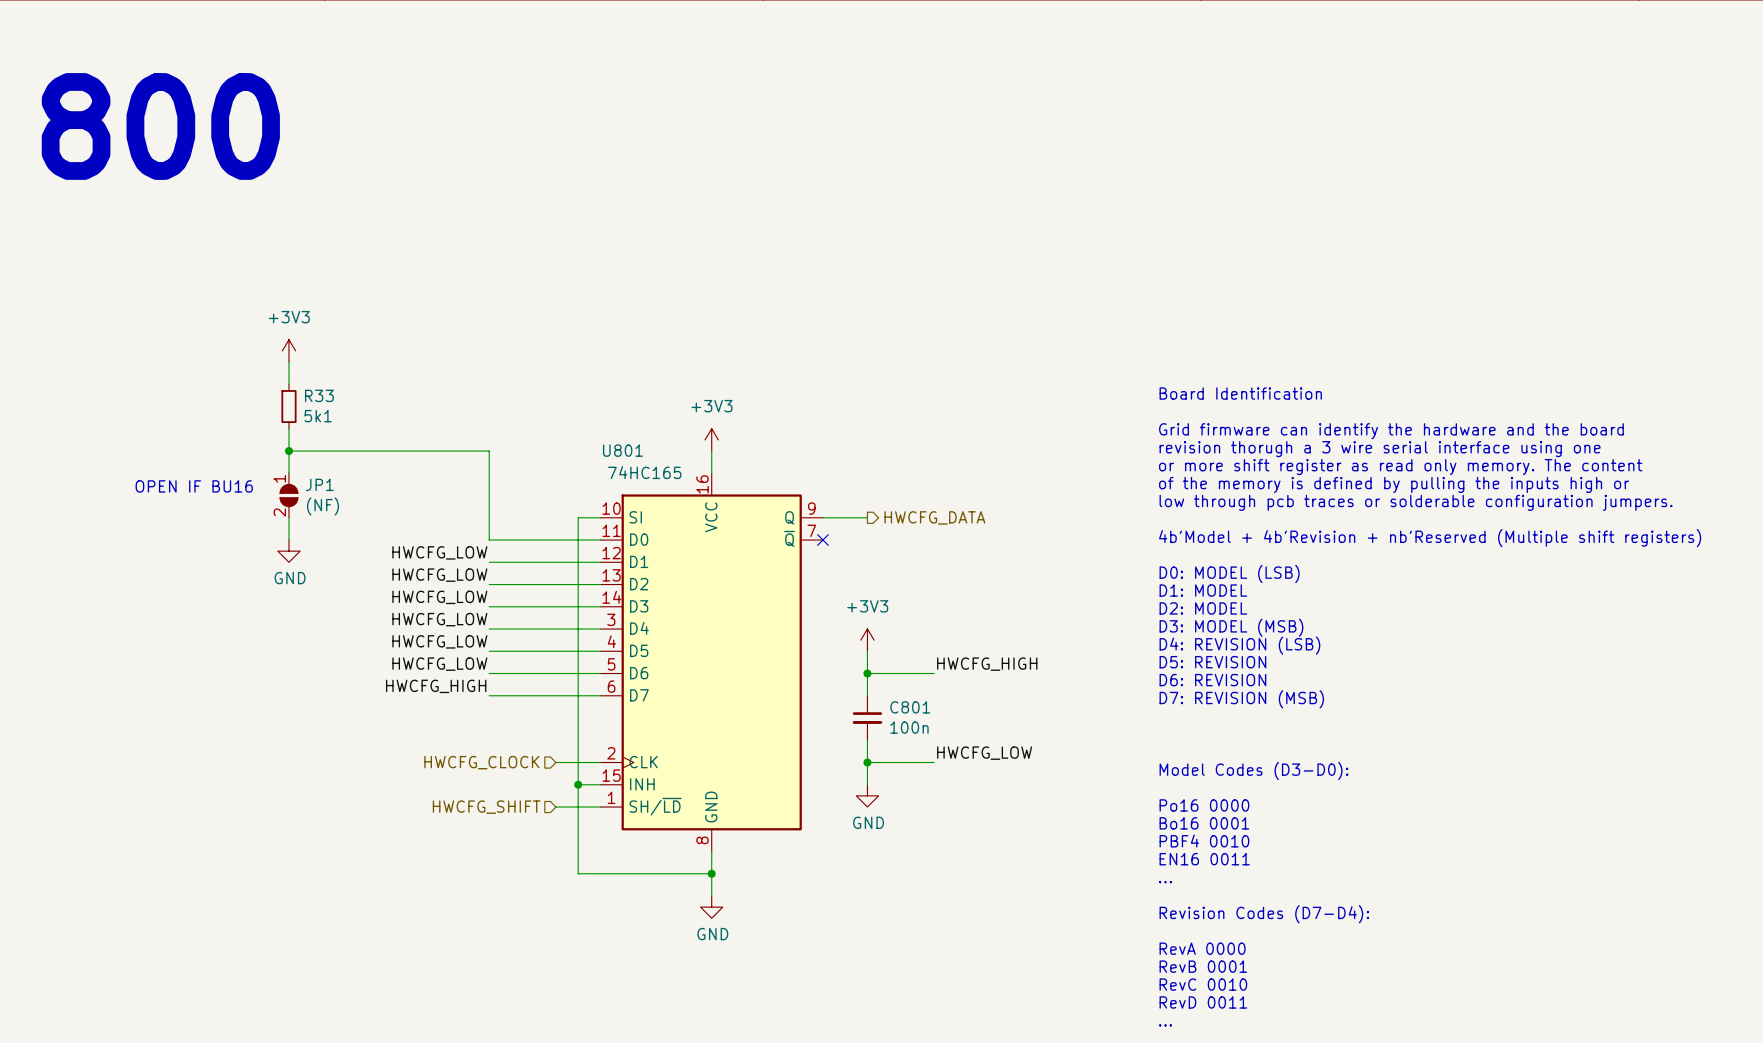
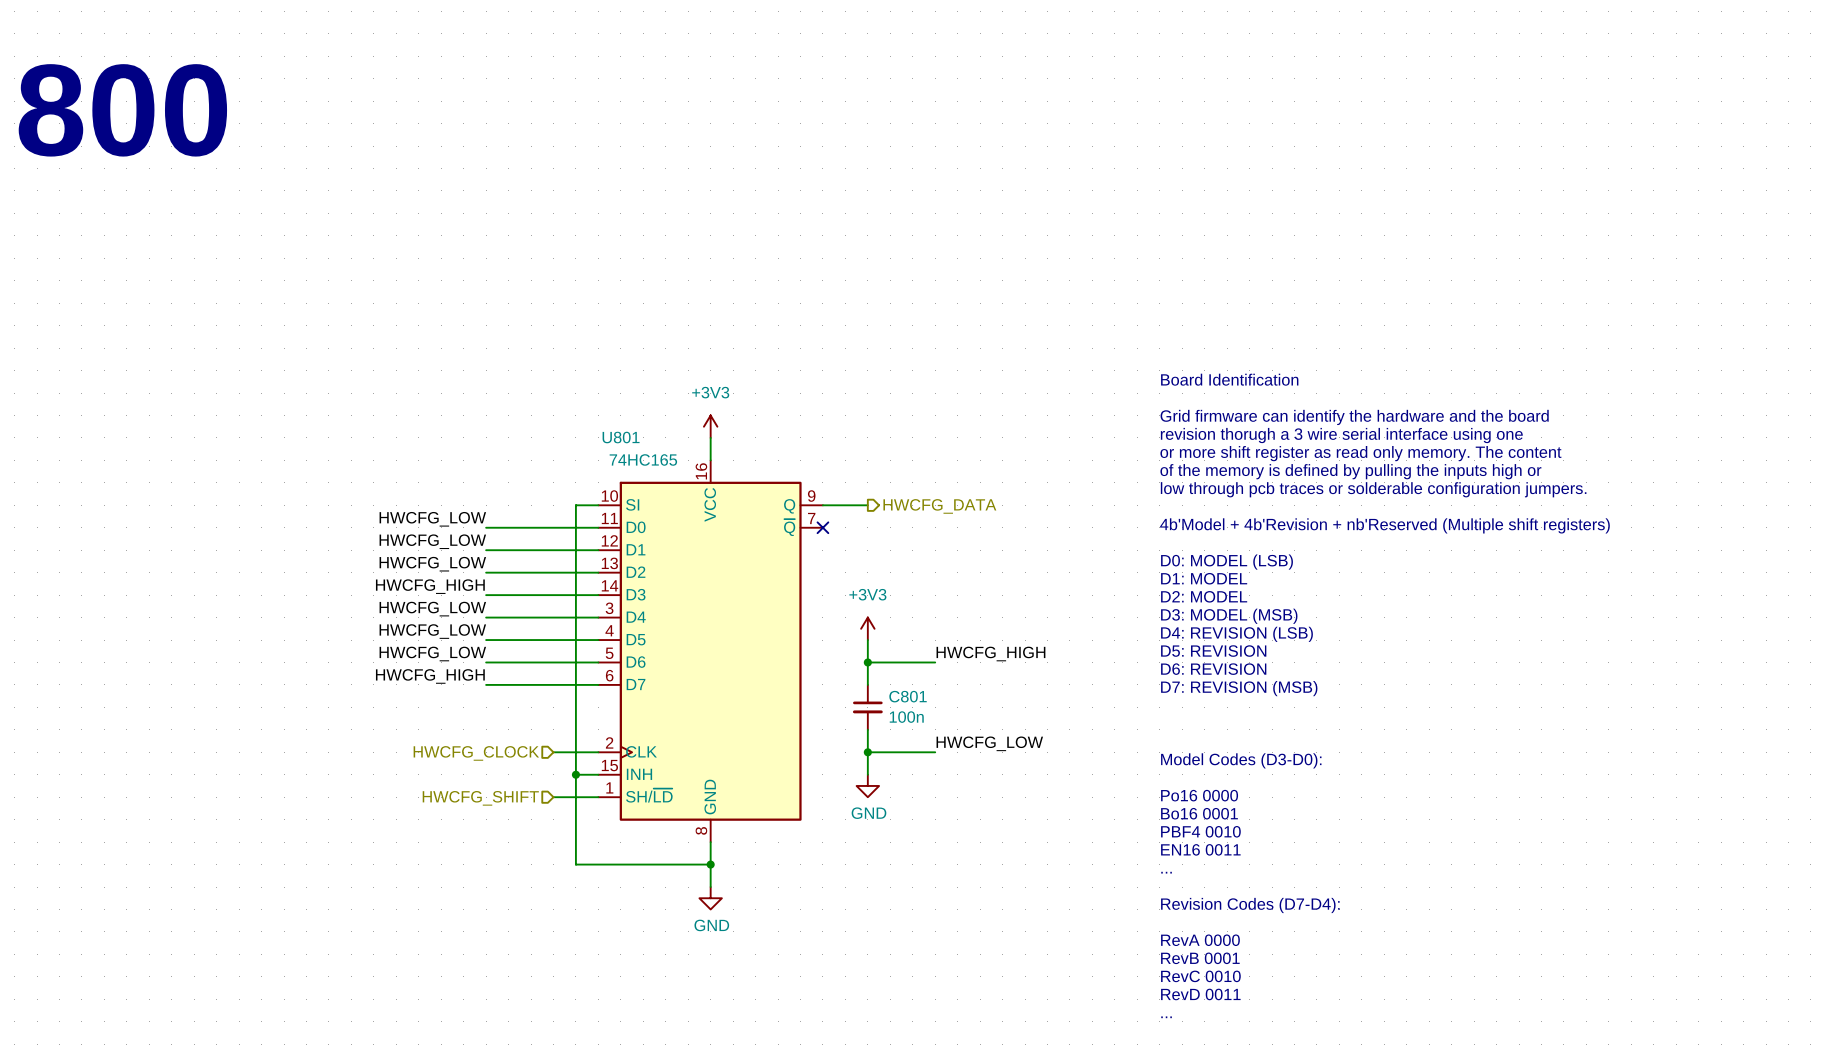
power symbol: +3V3 (288, 350) -> none
wire: (288, 362) (288, 384) -> none
R33: 5k1 (288, 406) -> none
wire: (288, 428) (288, 473) -> none
wire: (288, 451) (489, 451) (489, 540) -> none
junction: (288, 451) -> none
text: OPEN IF BU16 (194, 486) -> none
JP1: (NF) (288, 495) -> none
wire: (288, 517) (288, 540) -> none
label: none -> HWCFG_LOW (432, 519)
power symbol: GND (288, 551) -> none
label: HWCFG_LOW (439, 597) -> HWCFG_HIGH (430, 586)

